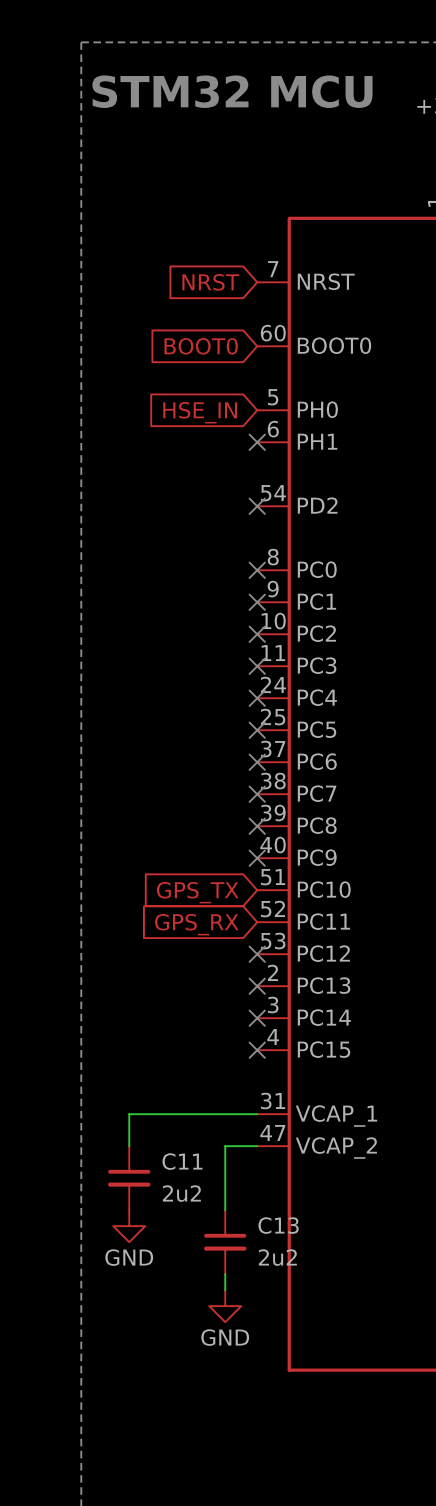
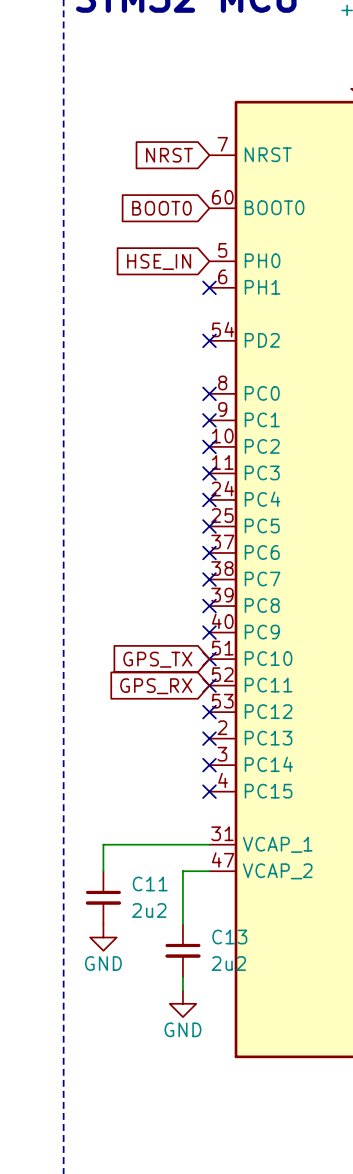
no-connect mark: none -> (209, 659)
no-connect mark: none -> (209, 685)

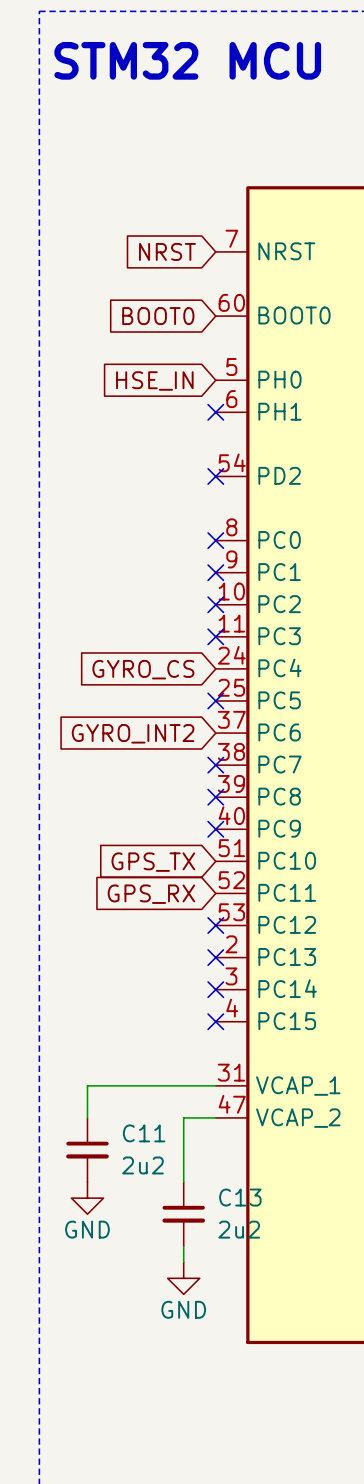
no-connect mark: (209, 499) -> none
global label: none -> GYRO_CS (143, 669)
global label: none -> GYRO_INT2 (133, 733)
no-connect mark: (209, 553) -> none
no-connect mark: (209, 659) -> none
no-connect mark: (209, 685) -> none

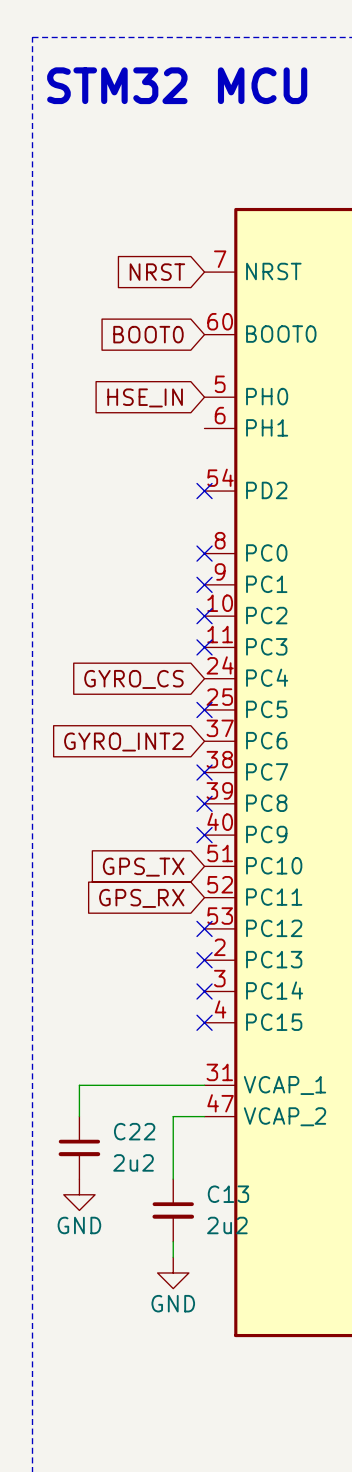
no-connect mark: (215, 412) -> none
C11 name: C11 (144, 1133) -> C22 (134, 1131)

